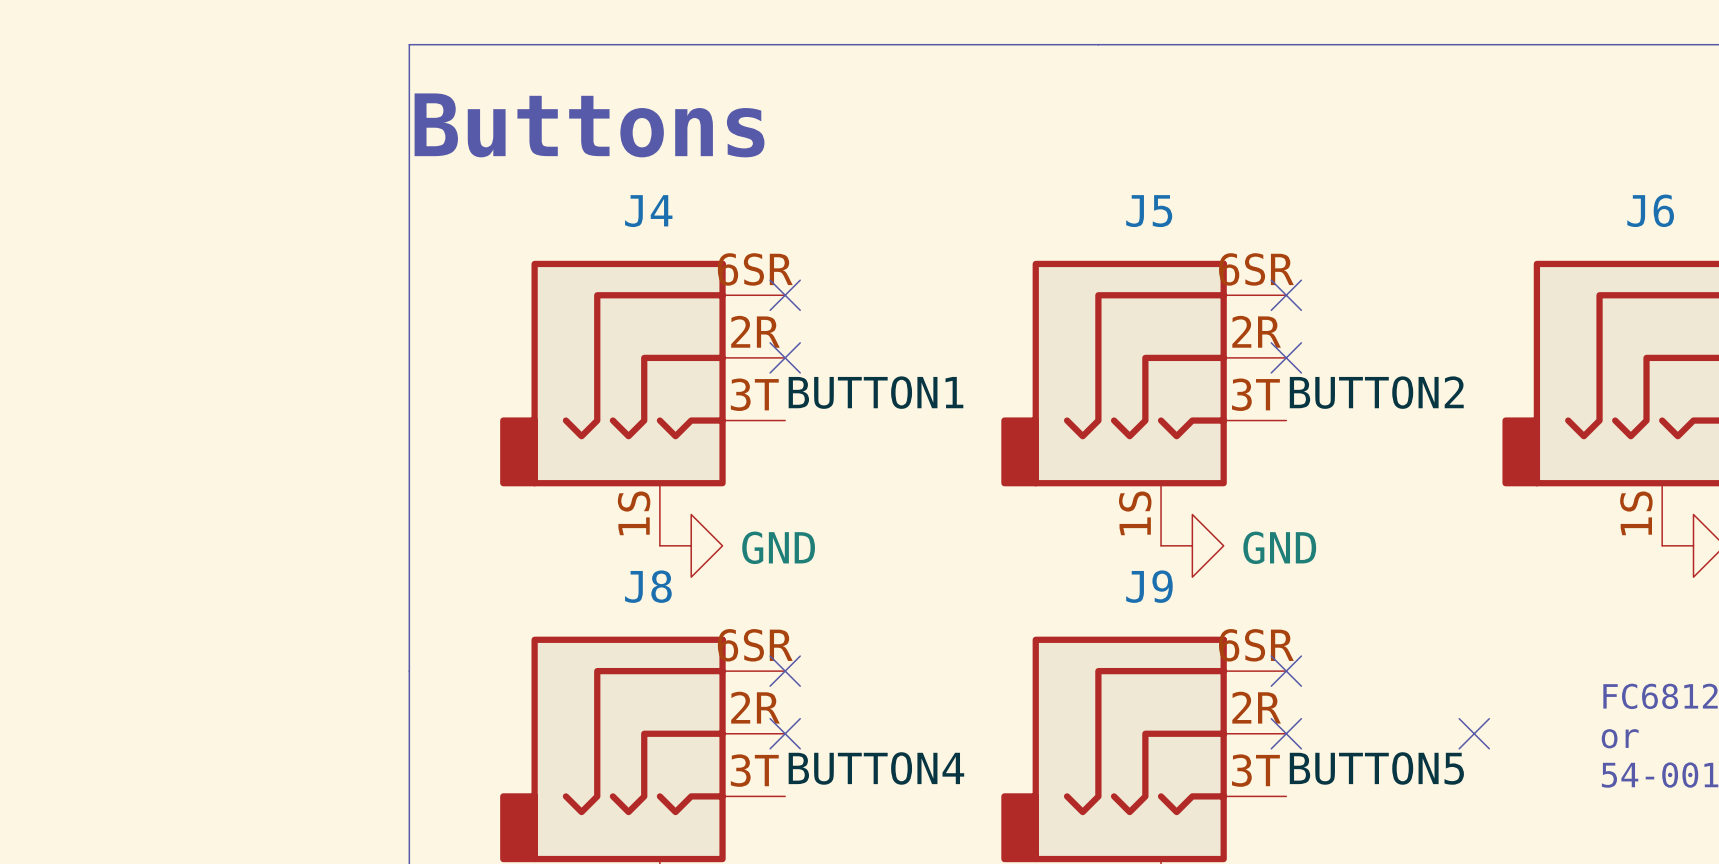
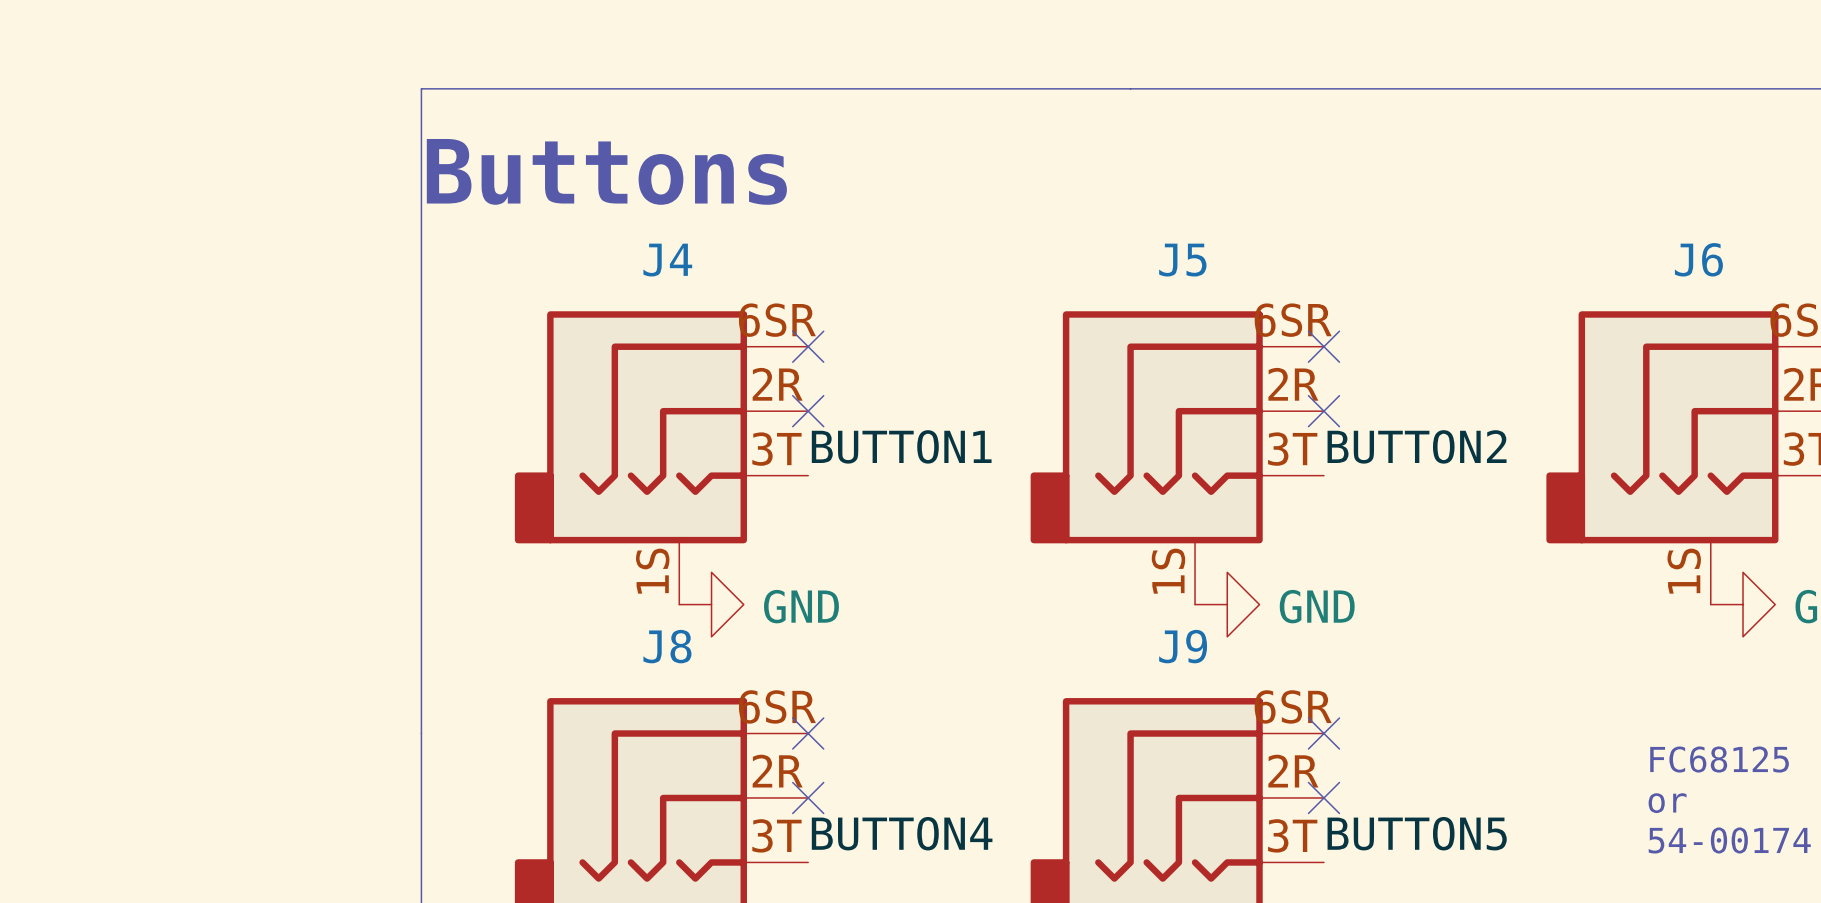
no-connect mark: (1474, 733) -> none

